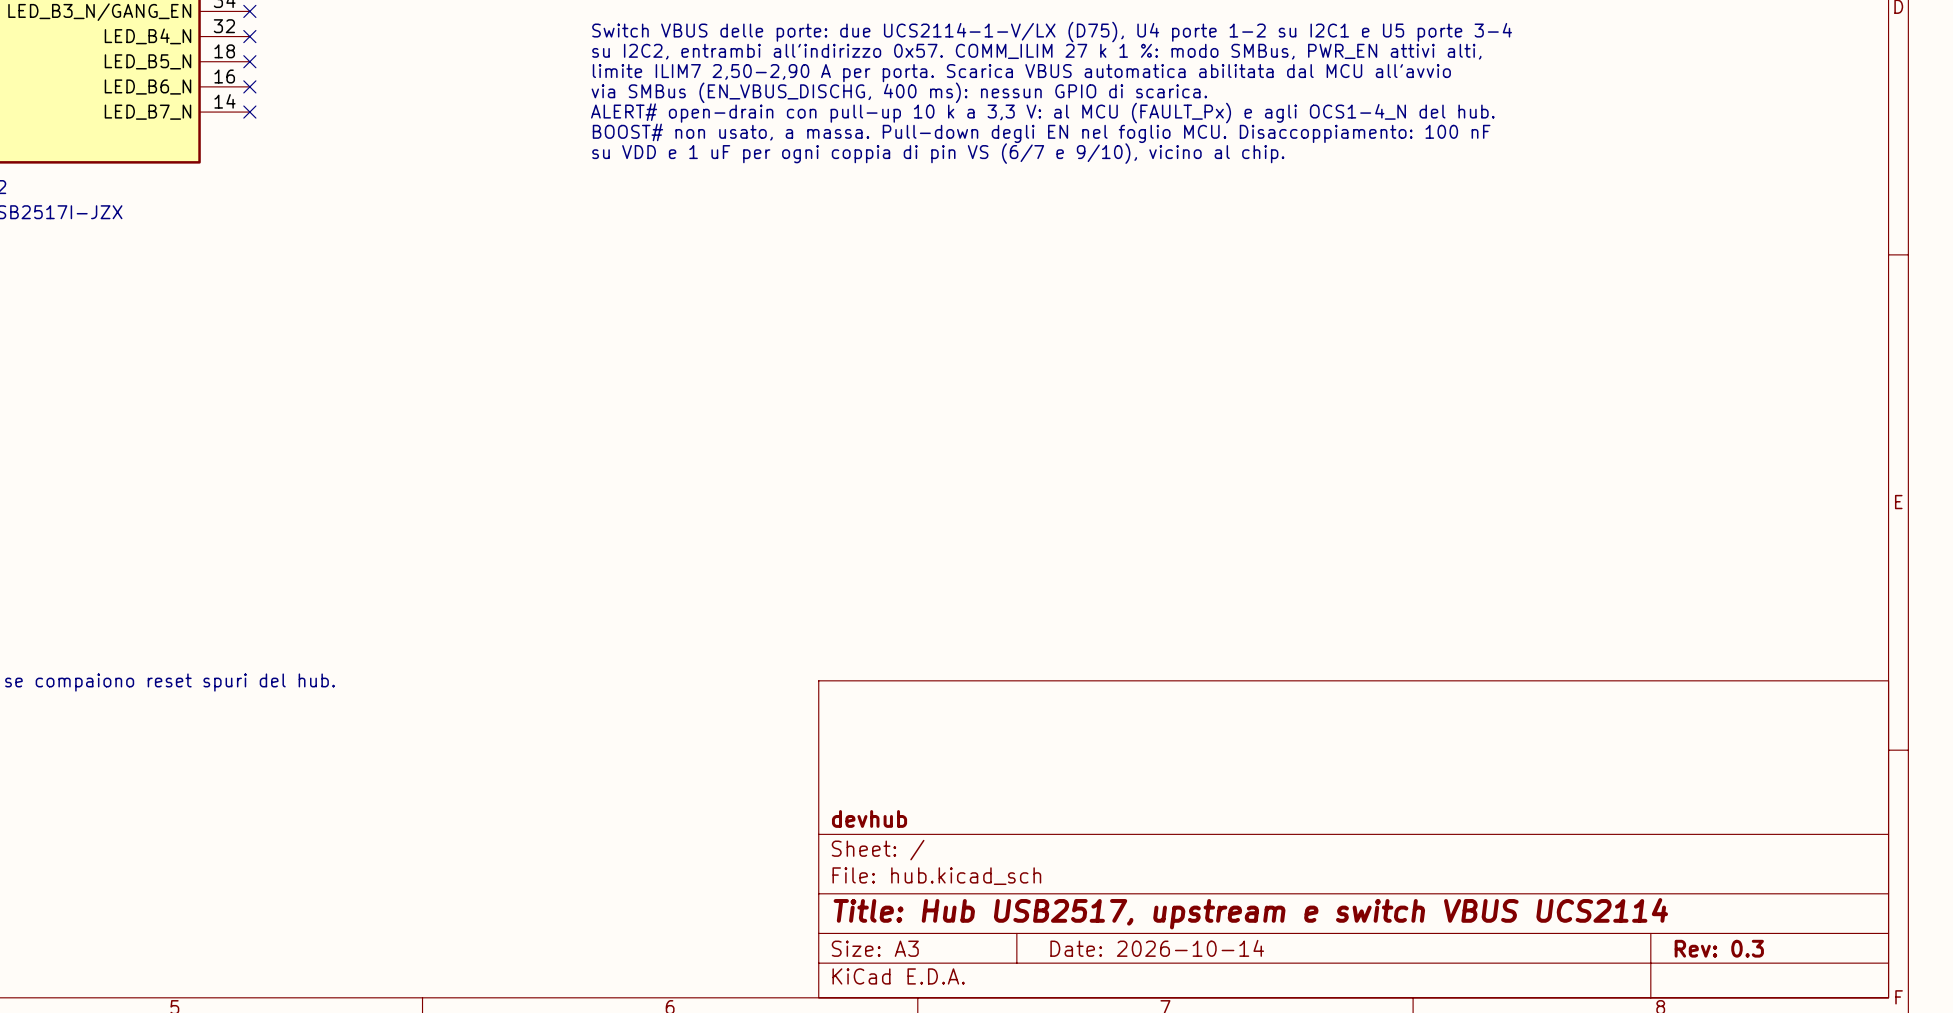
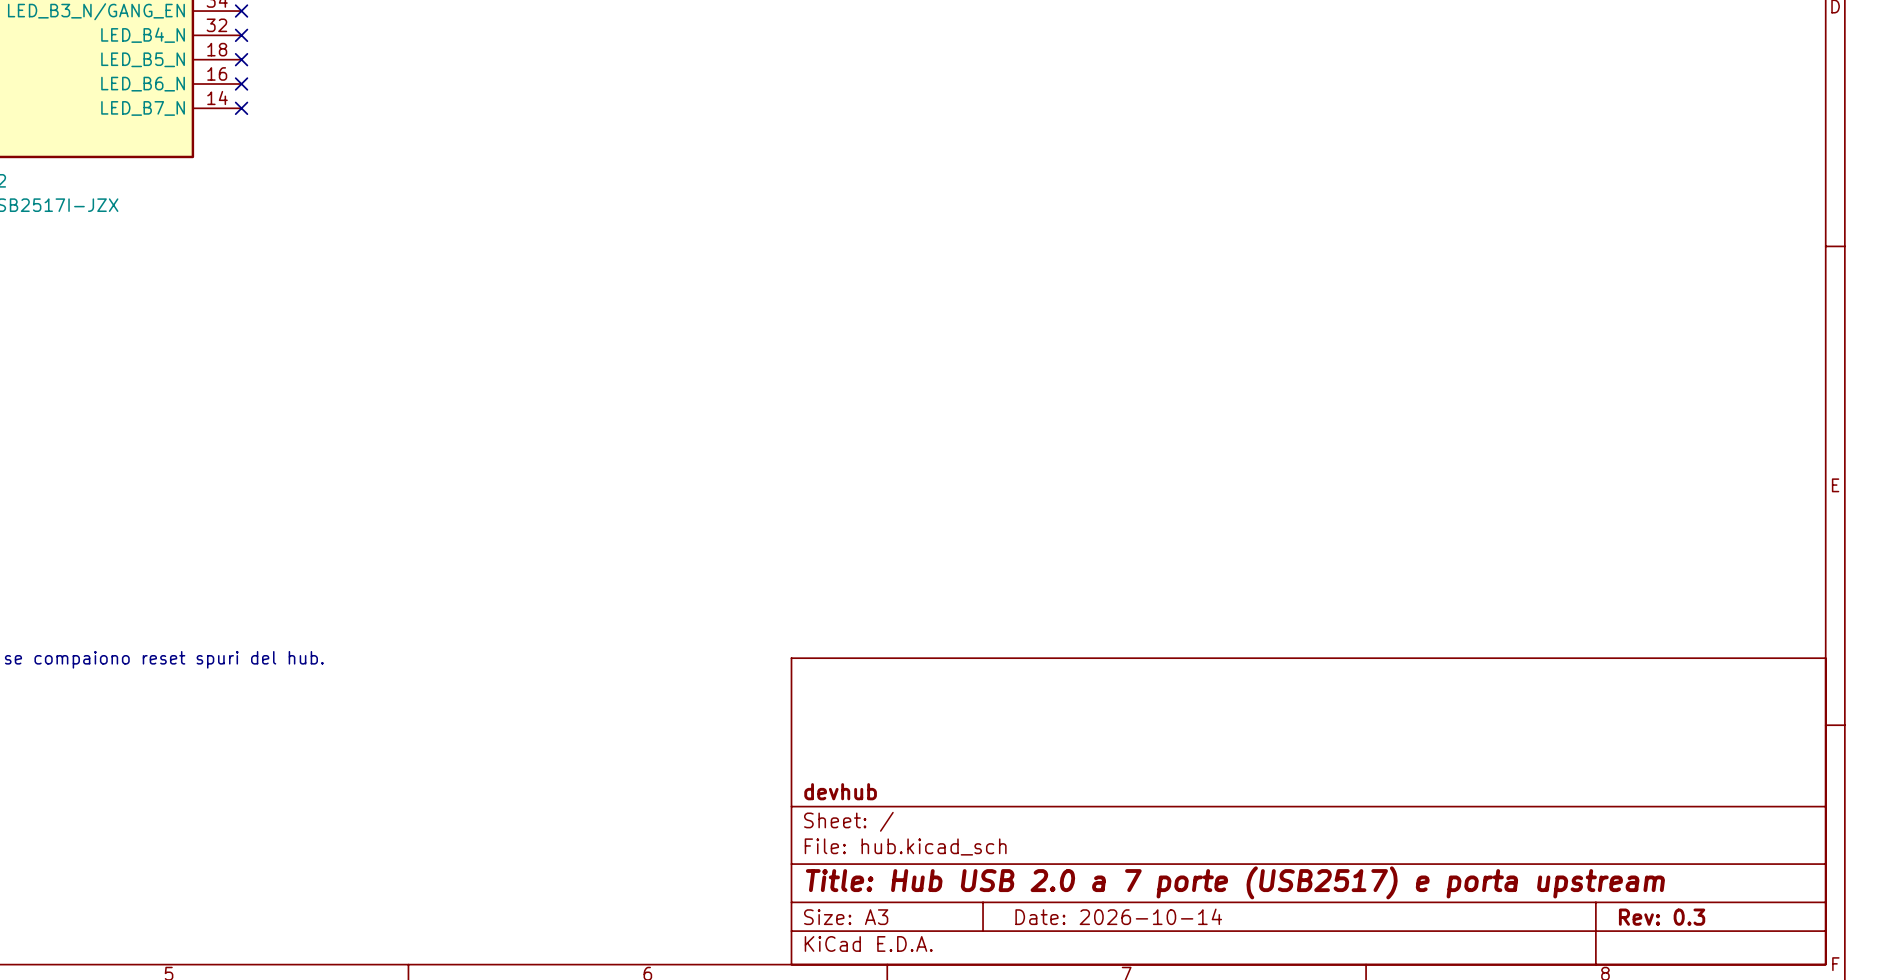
text: Switch VBUS delle porte: due UCS2114-1-V/LX (D75), U4 porte 1-2 su I2C1 e U5 porte 3-4 (1052, 32) -> none
text: su I2C2, entrambi all'indirizzo 0x57. COMM_ILIM 27 k 1 %: modo SMBus, PWR_EN attivi alti, (1036, 51) -> none
text: limite ILIM7 2,50-2,90 A per porta. Scarica VBUS automatica abilitata dal MCU all'avvio (1021, 73) -> none
text: via SMBus (EN_VBUS_DISCHG, 400 ms): nessun GPIO di scarica. (899, 92) -> none
text: ALERT# open-drain con pull-up 10 k a 3,3 V: al MCU (FAULT_Px) e agli OCS1-4_N del hub. (1042, 113) -> none
text: BOOST# non usato, a massa. Pull-down degli EN nel foglio MCU. Disaccoppiamento: 100 nF (1041, 133) -> none
text: su VDD e 1 uF per ogni coppia di pin VS (6/7 e 9/10), vicino al chip. (938, 153) -> none
title block: Title: Hub USB2517, upstream e switch VBUS UCS2114 (1250, 913) -> Title: Hub USB 2.0 a 7 porte (USB2517) e porta upstream (1235, 882)

